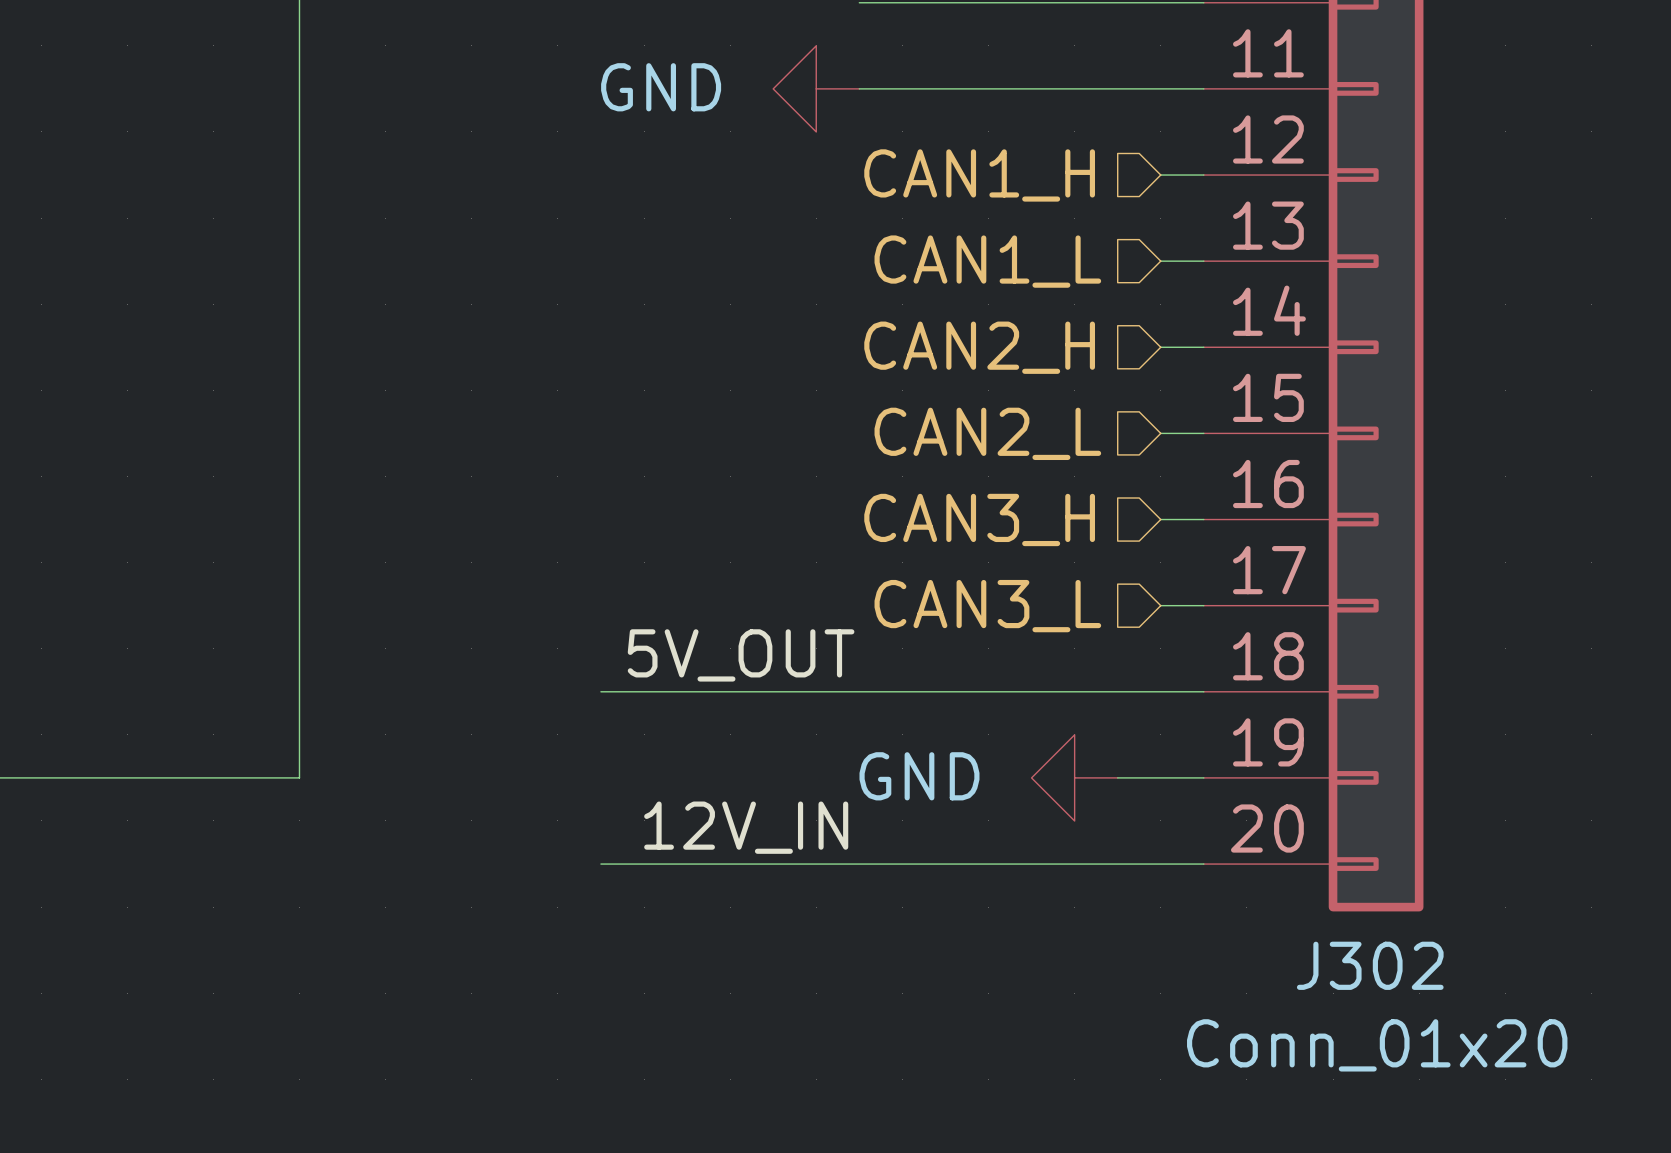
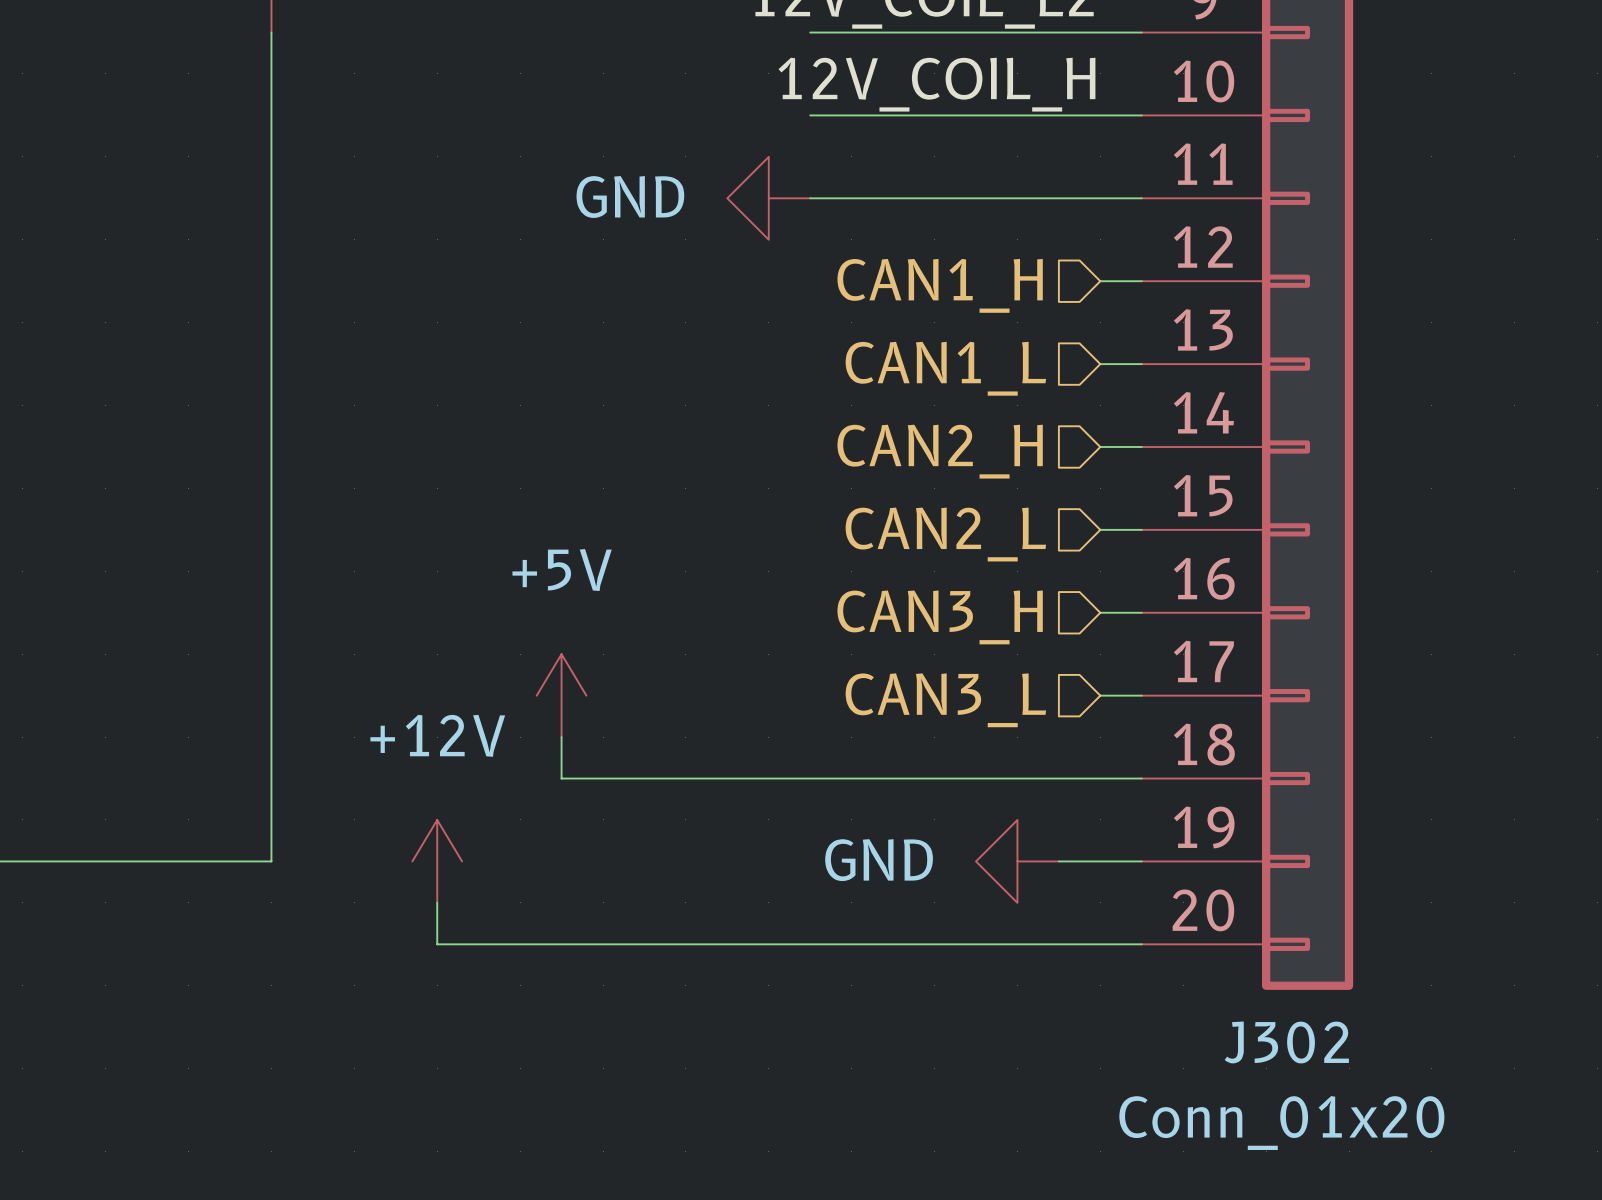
power symbol: none -> +5V (561, 695)
wire: none -> (561, 737) (561, 778)
label: 5V_OUT (741, 655) -> none
power symbol: none -> +12V (437, 861)
wire: none -> (437, 902) (437, 944) (561, 944)
label: 12V_IN (746, 827) -> none

